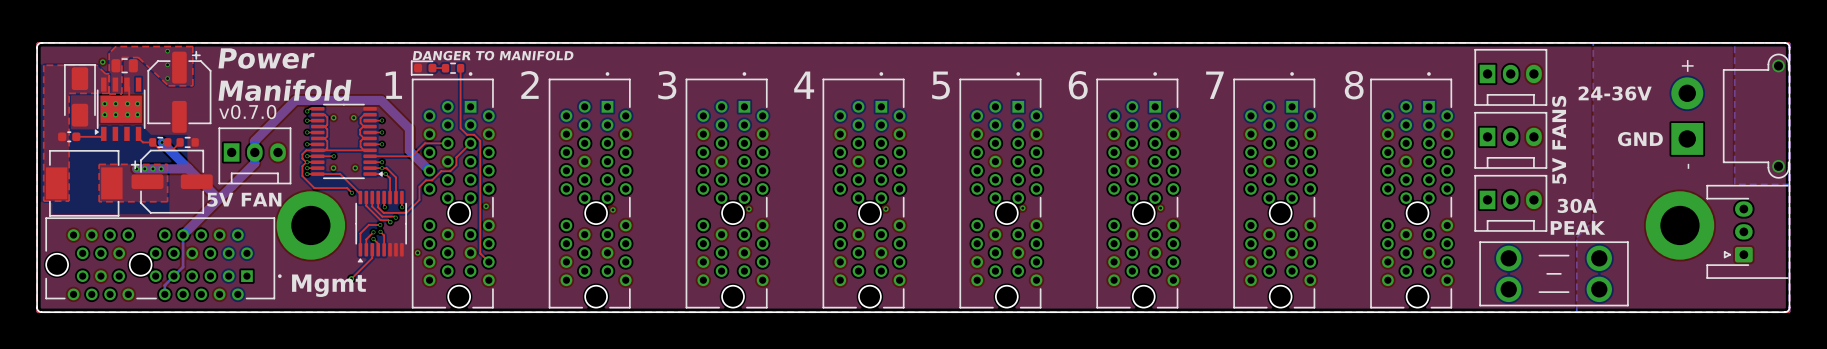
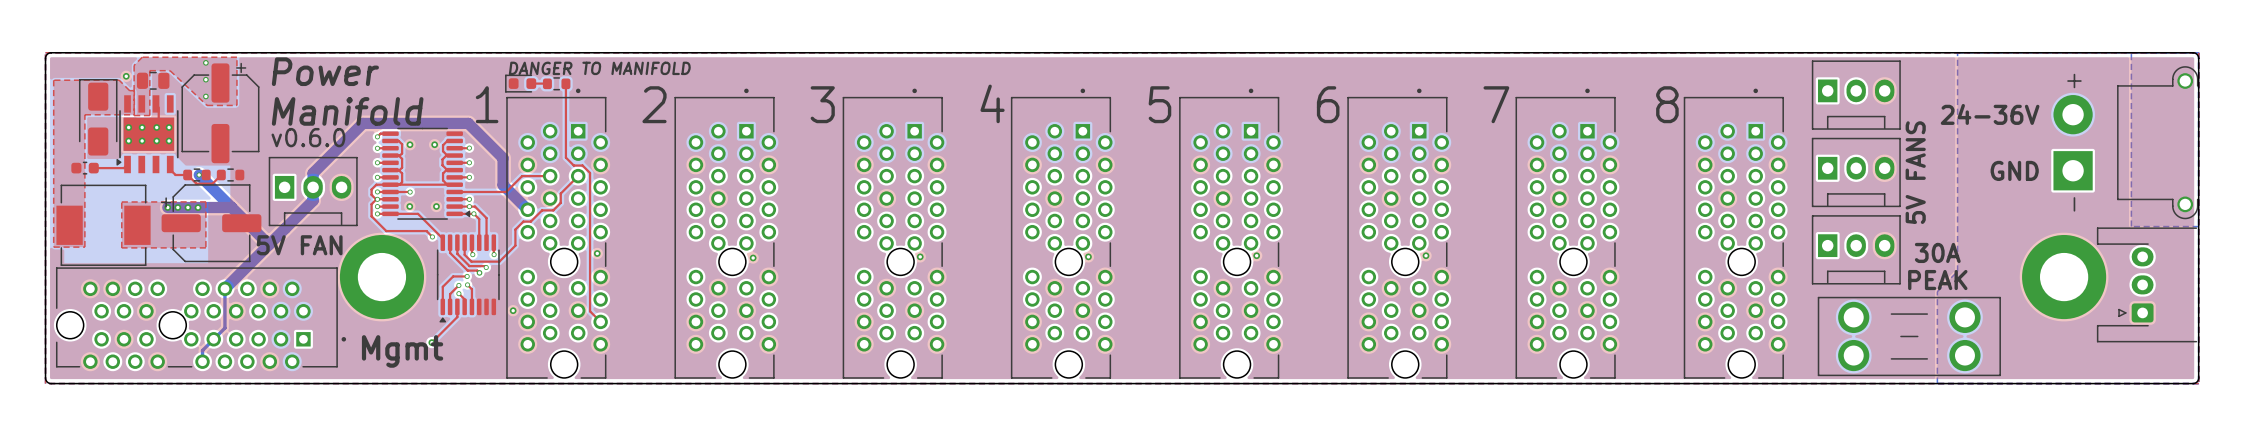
text: v0.7.0 (247, 112) -> v0.6.0 (308, 137)

